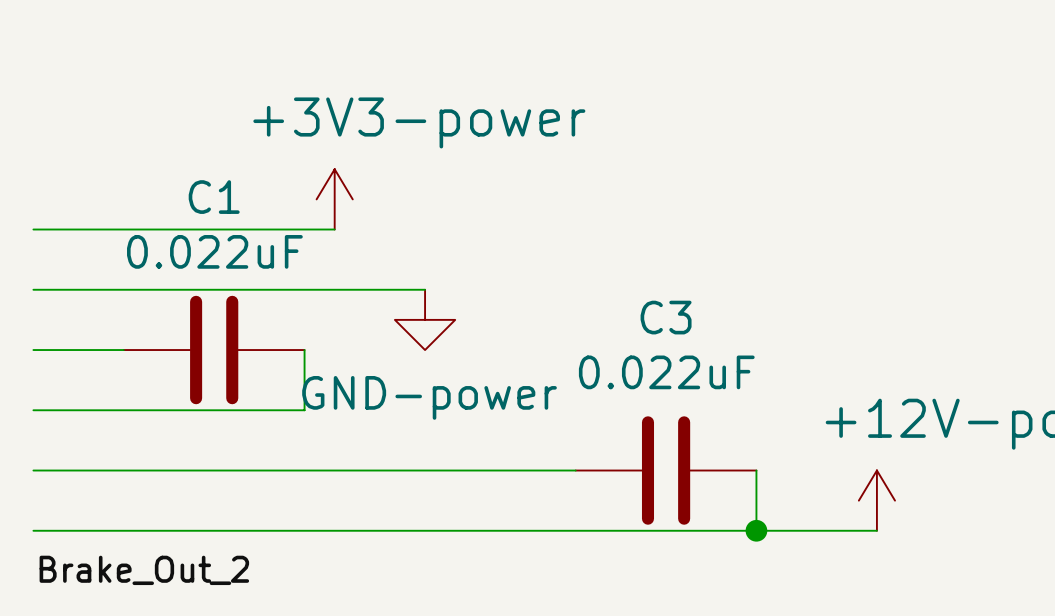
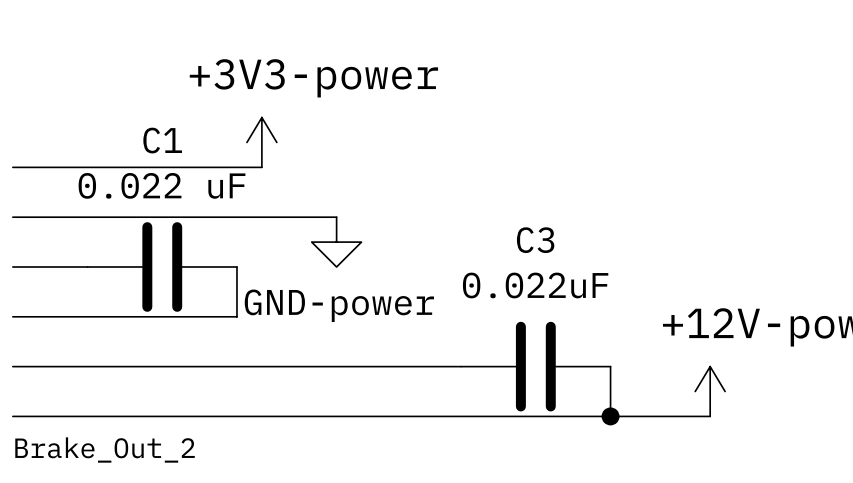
C1 value: 0.022uF (214, 251) -> 0.022 uF (162, 185)

